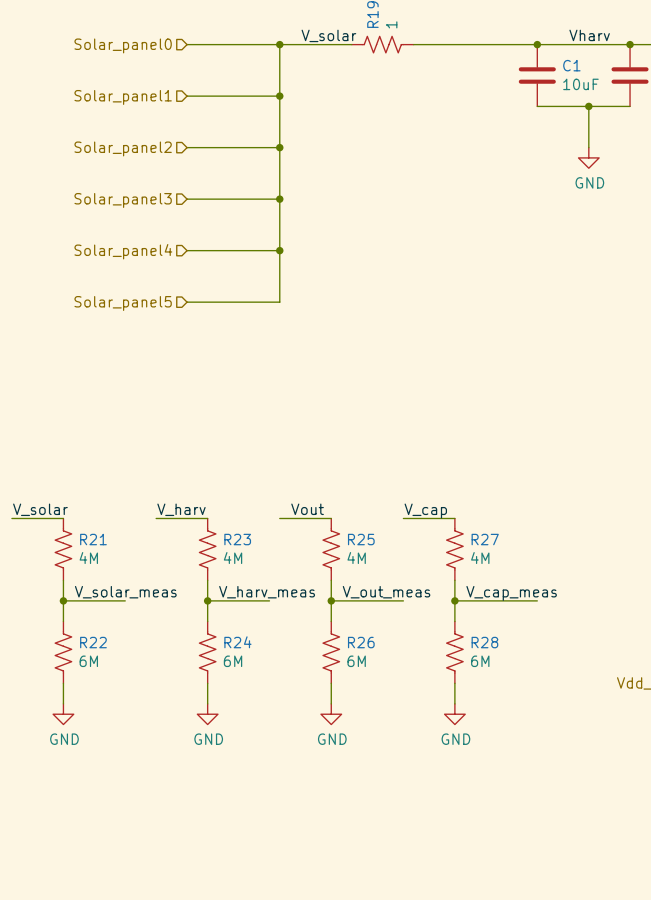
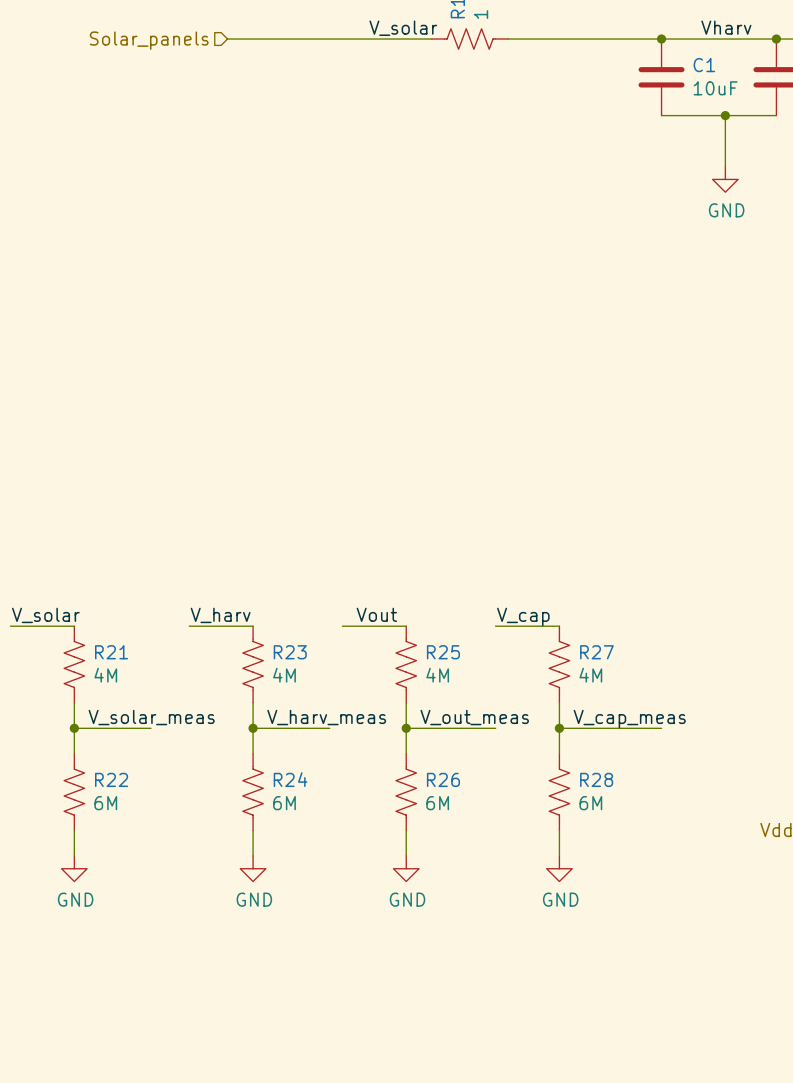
wire: (279, 44) (279, 302) (187, 302) -> none
junction: (279, 44) -> none
hierarchical label: Solar_panel0 (123, 45) -> Solar_panels (149, 40)
wire: (187, 96) (279, 96) -> none
junction: (279, 96) -> none
hierarchical label: Solar_panel1 (123, 97) -> none
wire: (187, 147) (279, 147) -> none
junction: (279, 147) -> none
hierarchical label: Solar_panel2 (123, 148) -> none
wire: (187, 199) (279, 199) -> none
junction: (279, 199) -> none
hierarchical label: Solar_panel3 (123, 200) -> none
wire: (187, 250) (279, 250) -> none
junction: (279, 250) -> none
hierarchical label: Solar_panel4 (123, 251) -> none
hierarchical label: Solar_panel5 (123, 303) -> none

